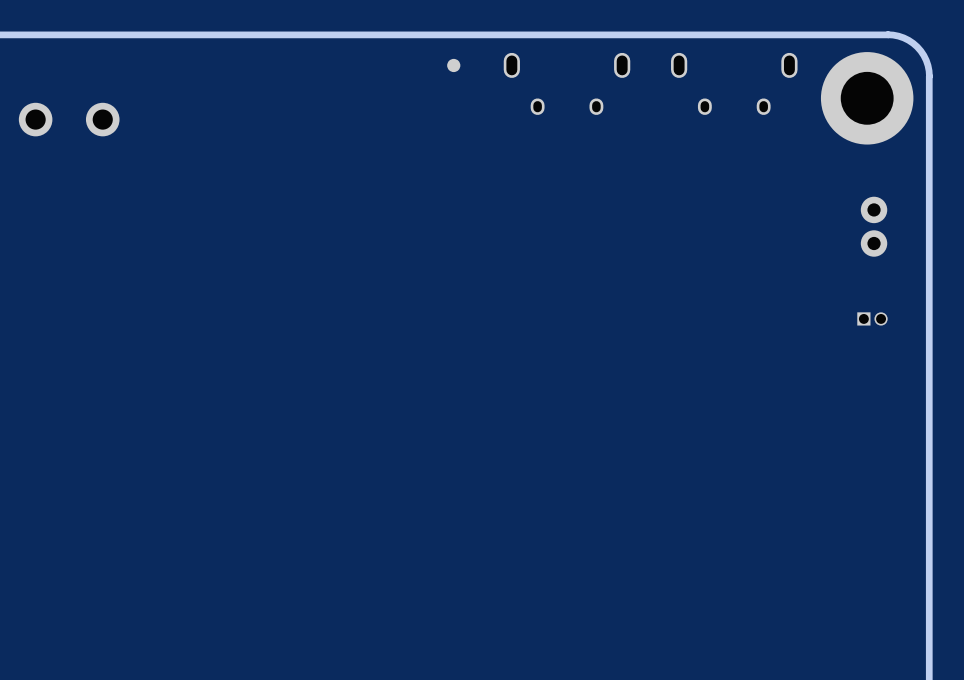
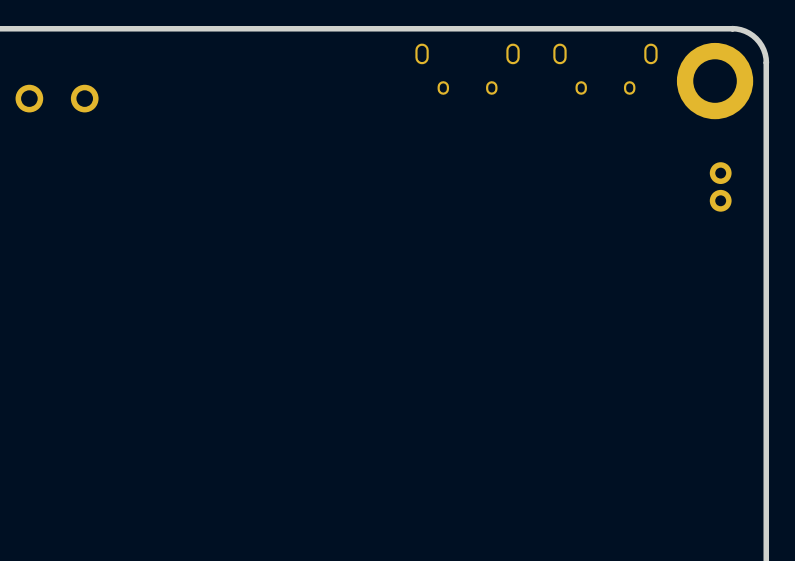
part: (453, 65) -> none
part: (872, 318) -> none

